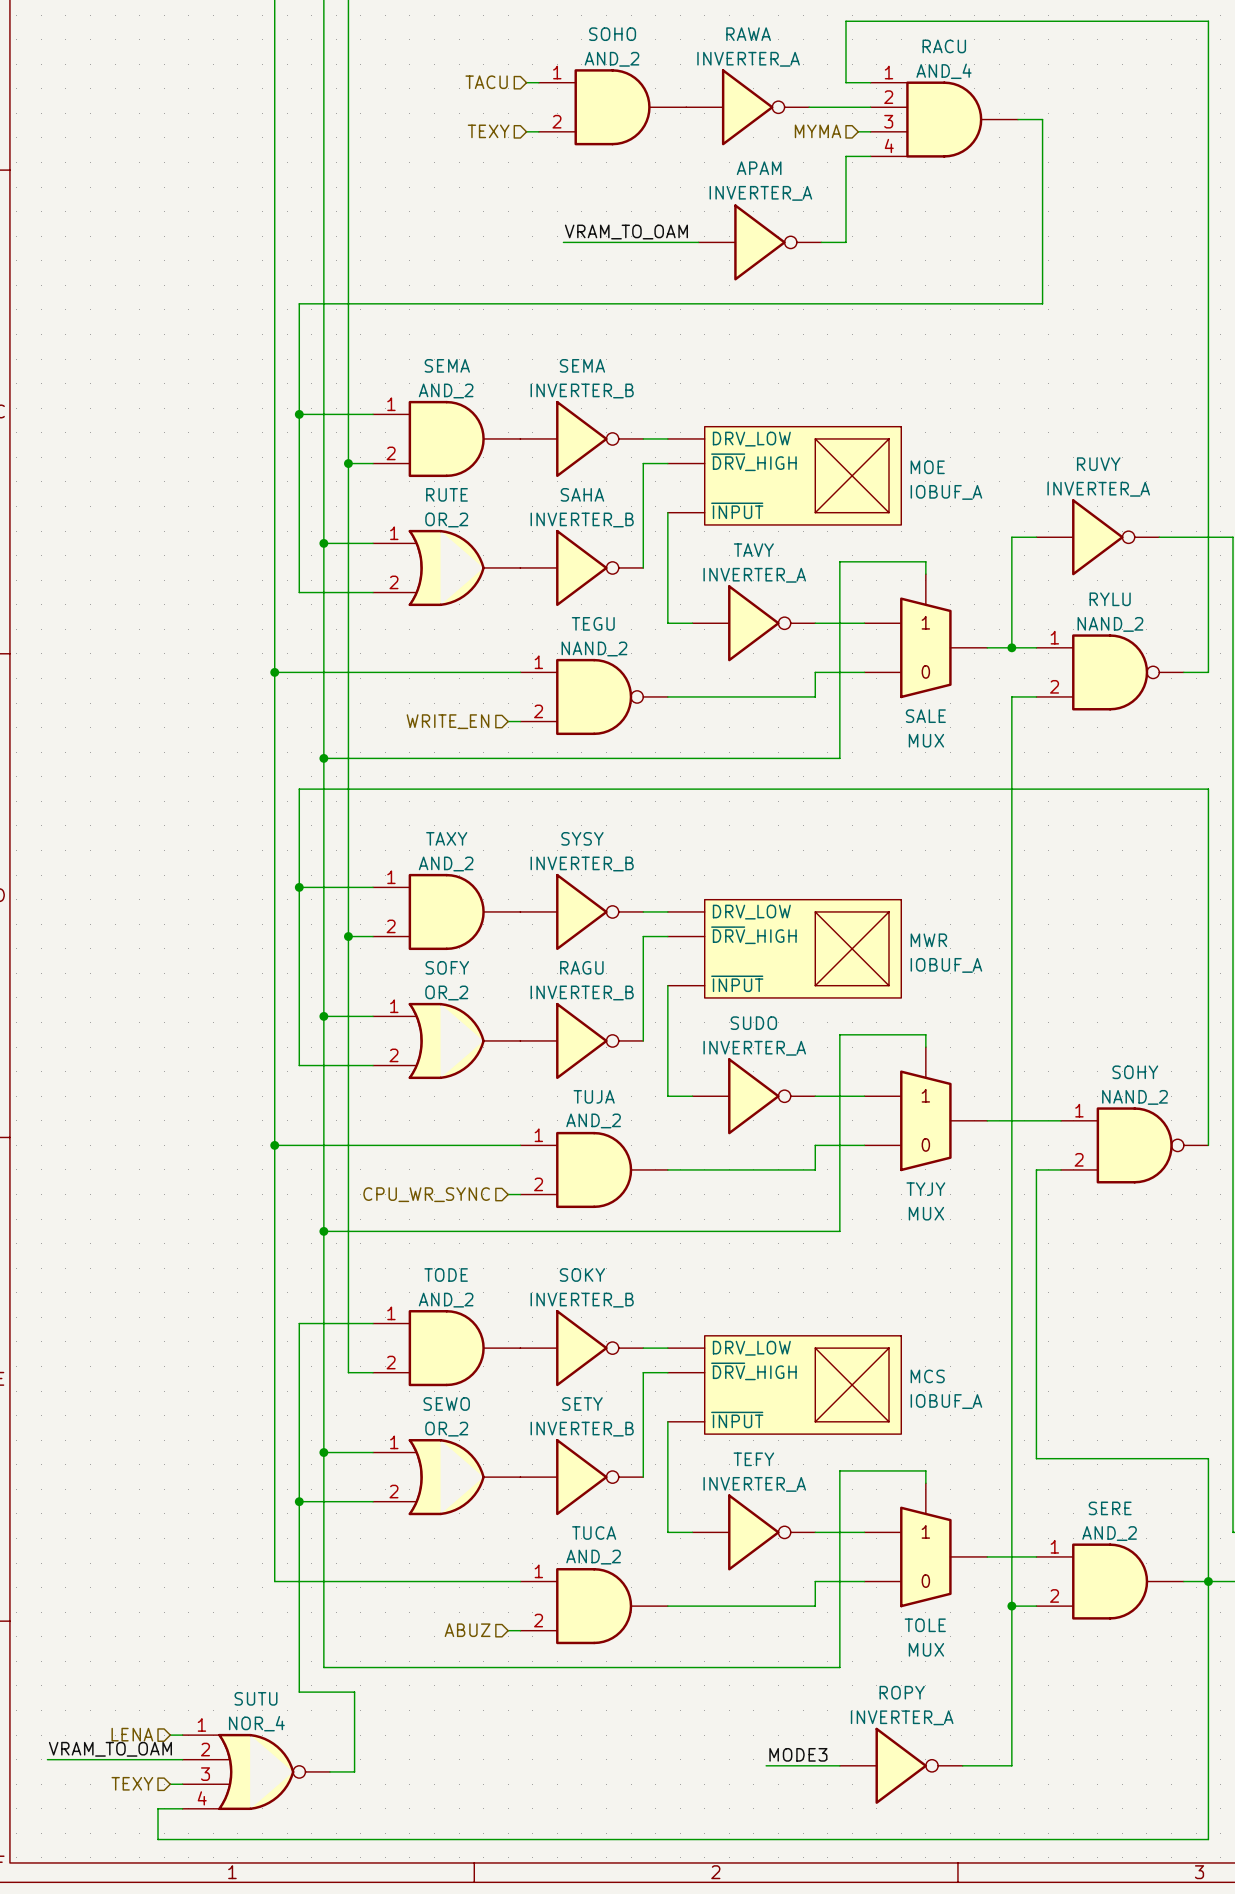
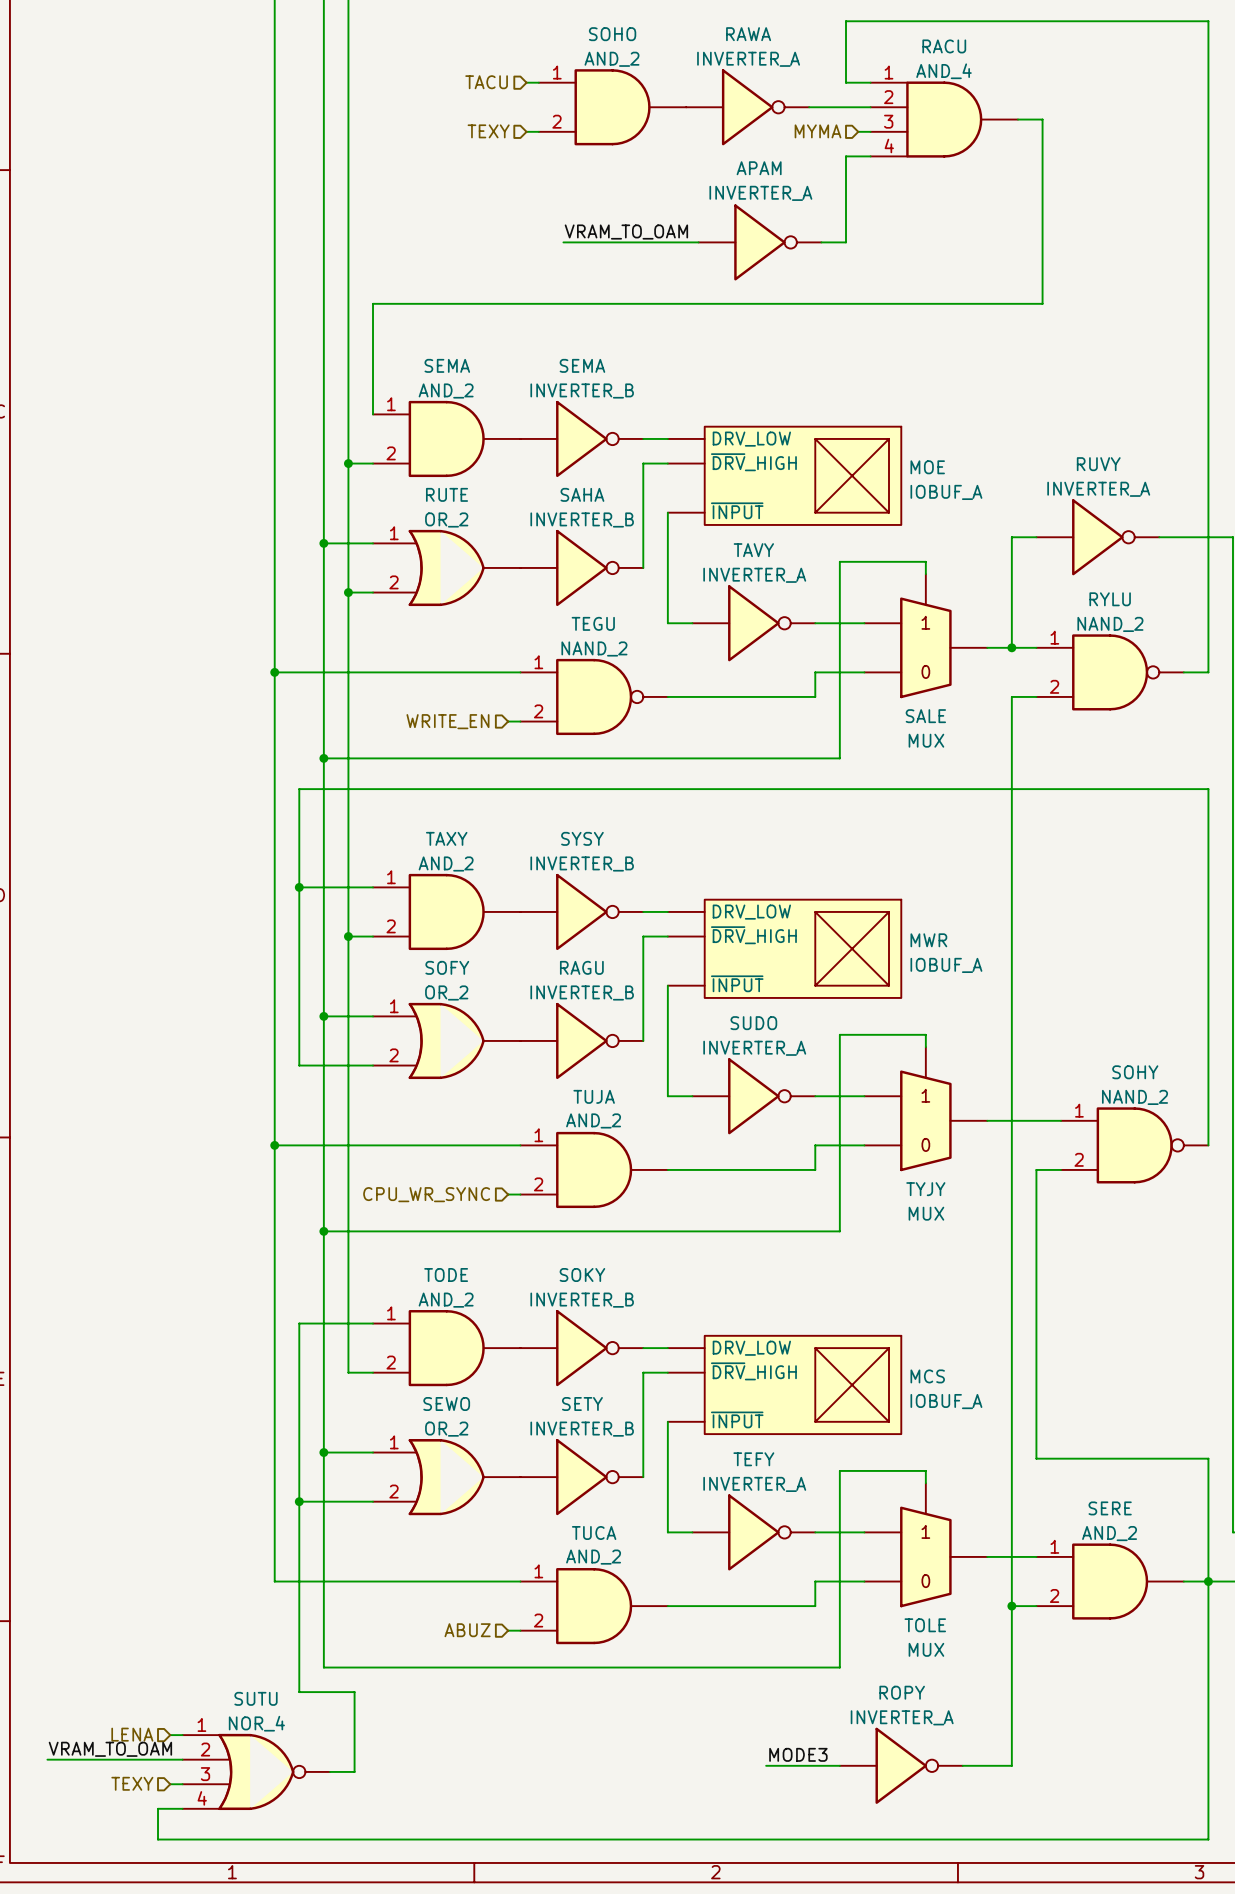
wire: (373, 303) (299, 303) (299, 592) (348, 592) -> none
wire: (299, 414) (373, 414) -> (373, 303) (373, 414)
junction: (299, 414) -> none
junction: none -> (348, 592)

